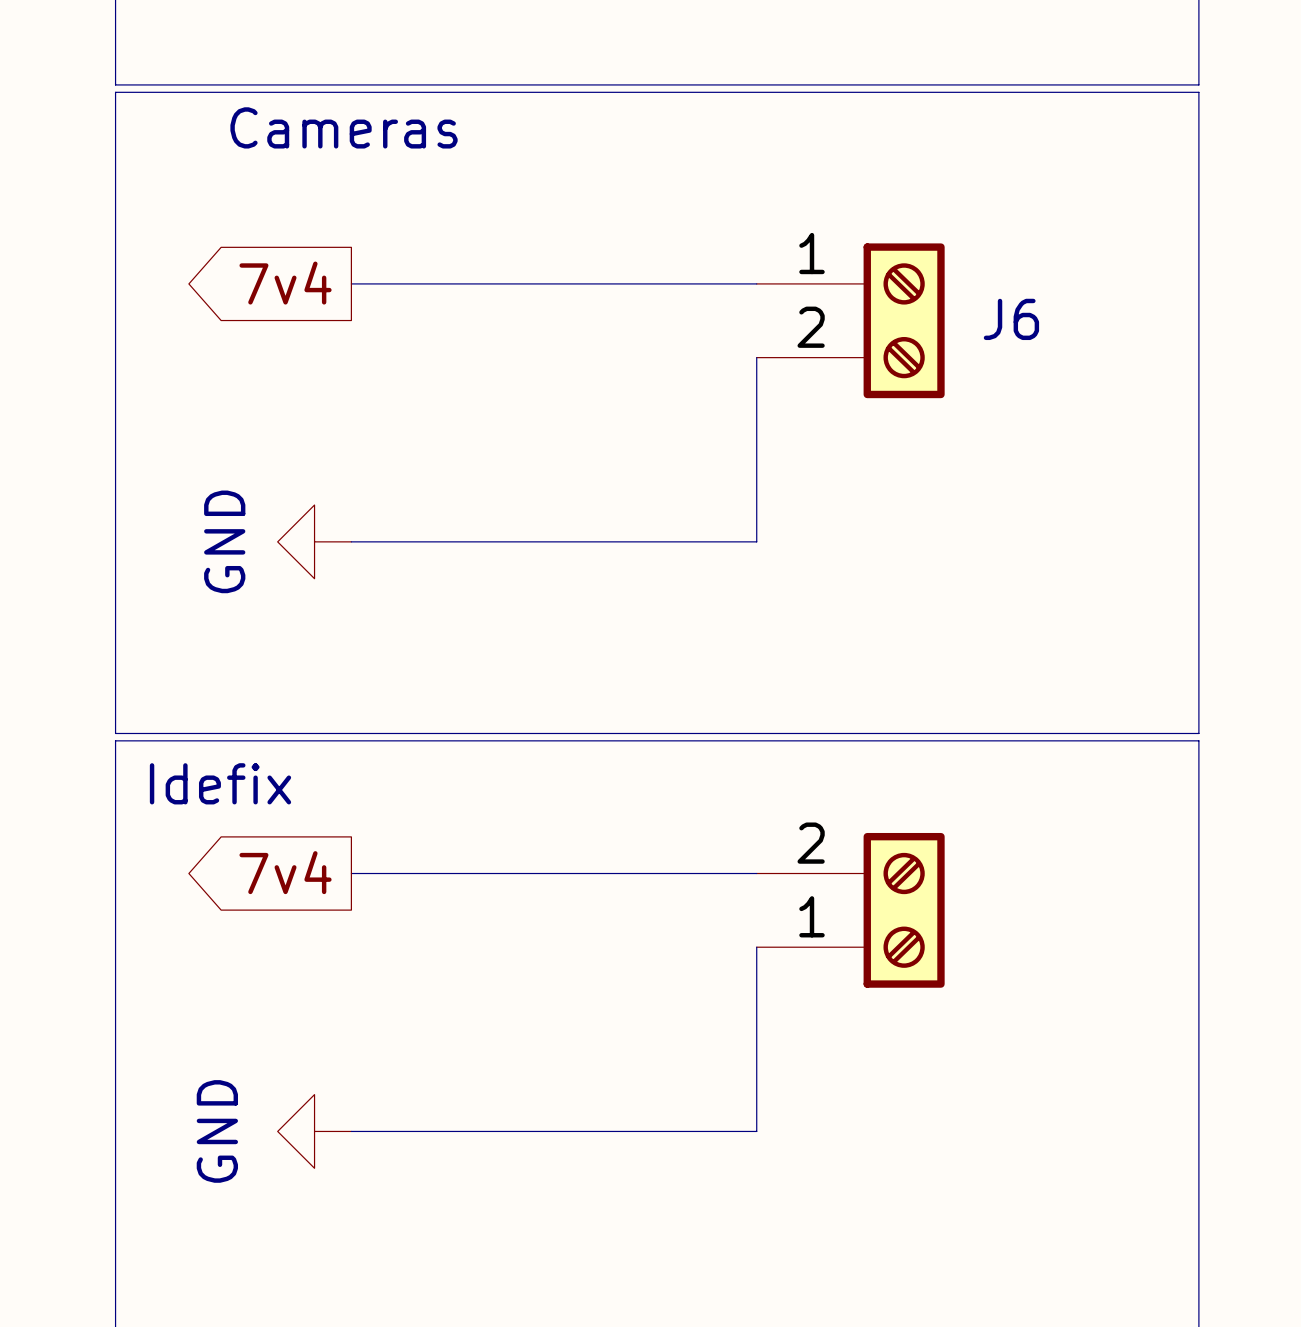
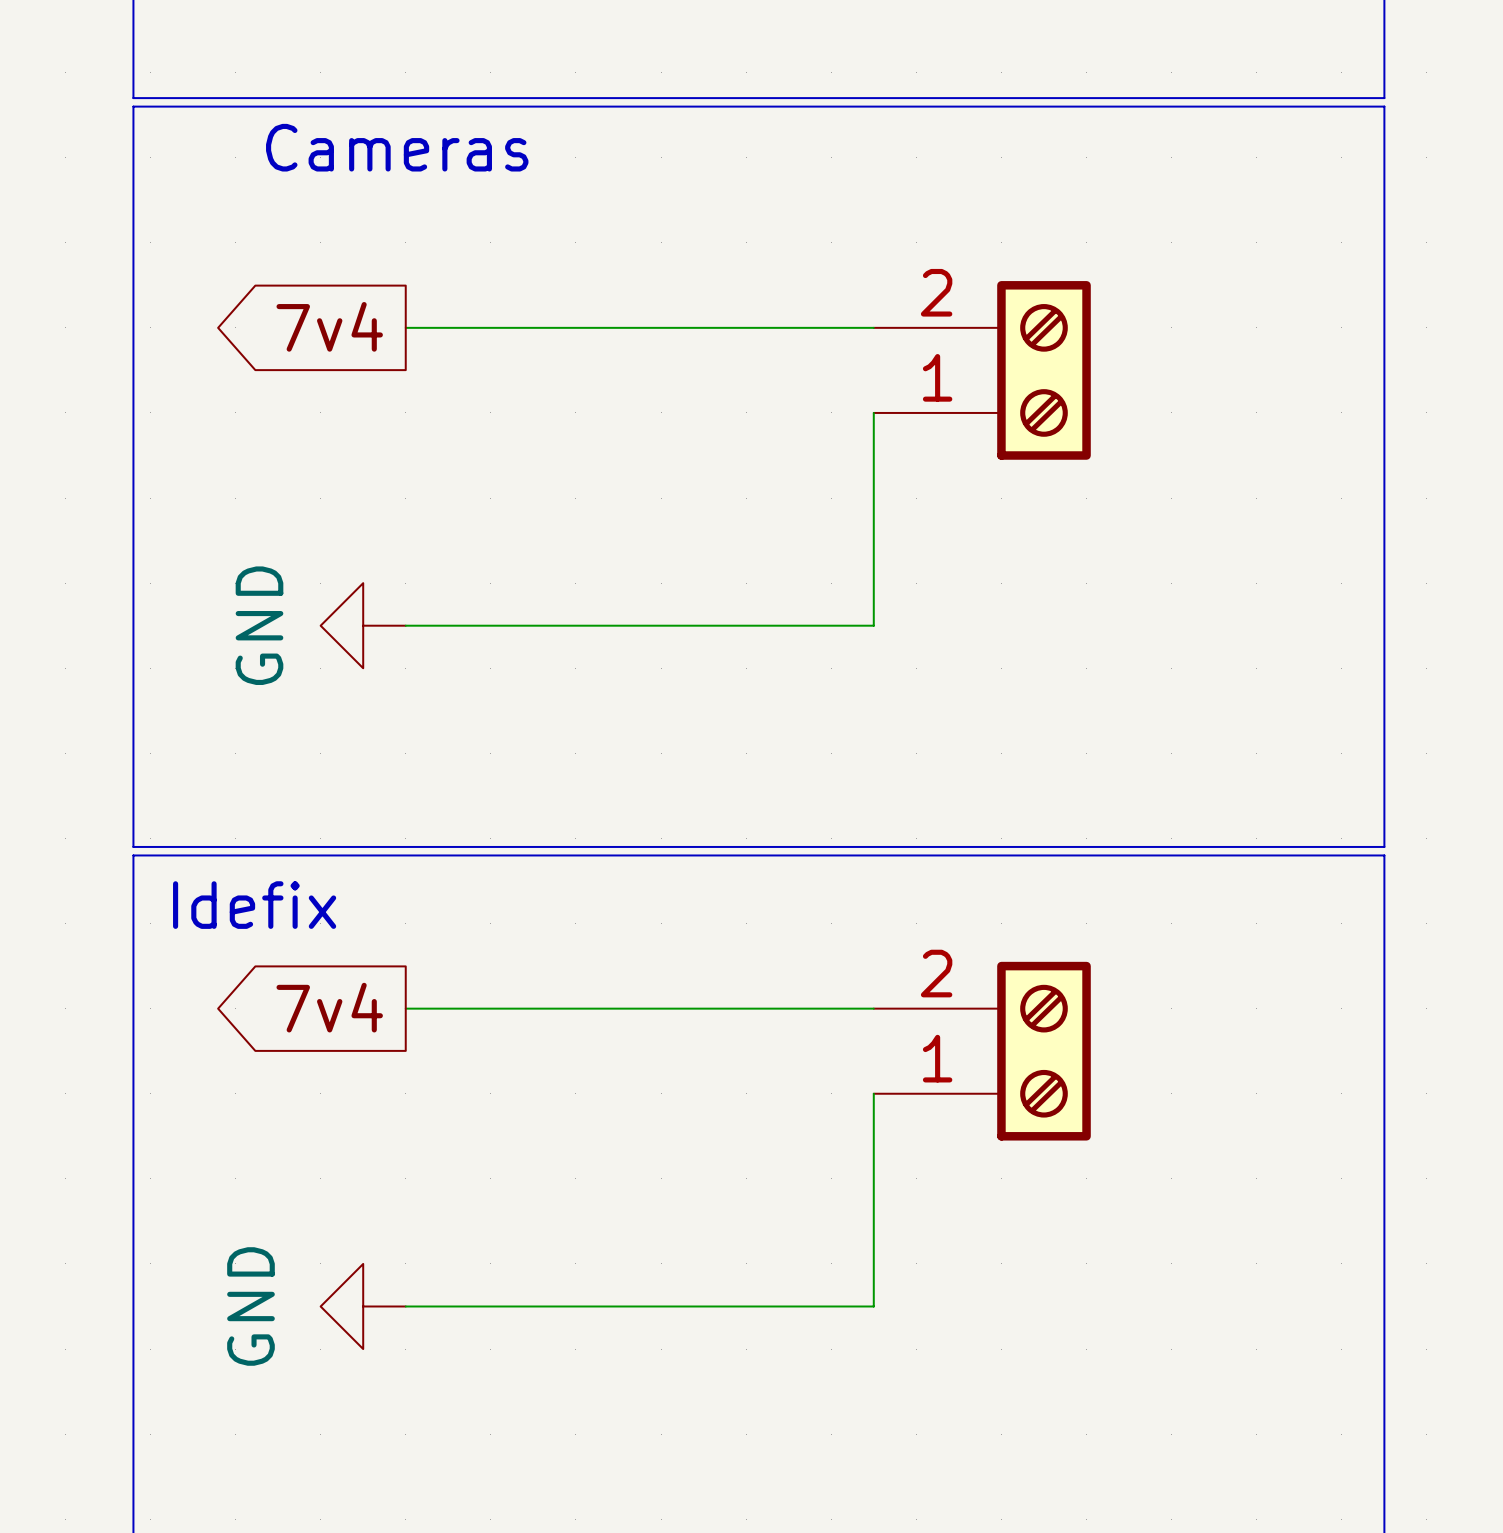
J6: (850, 320) -> none
part: none -> (982, 370)

